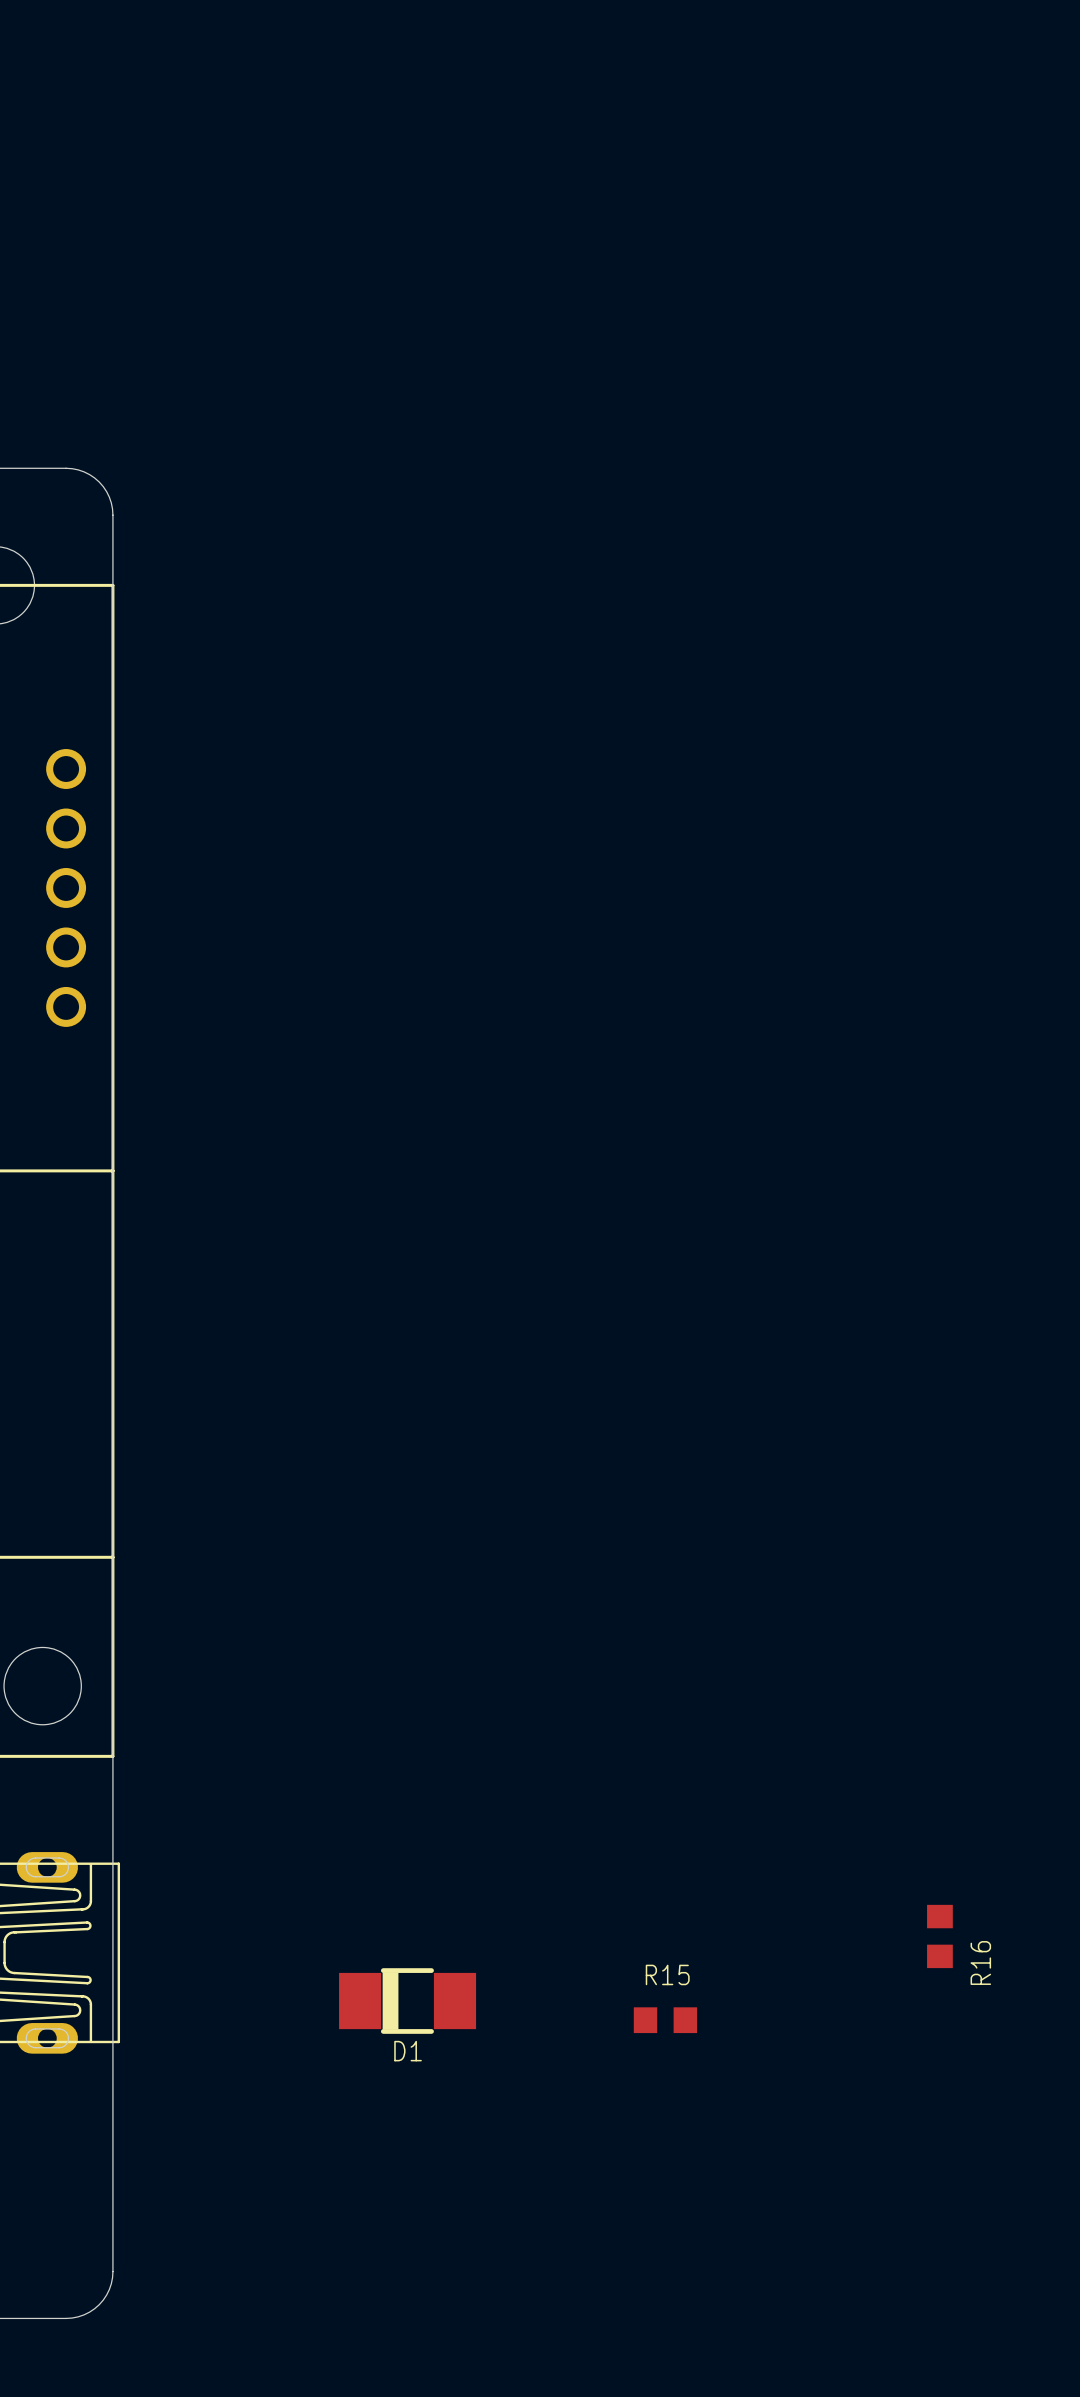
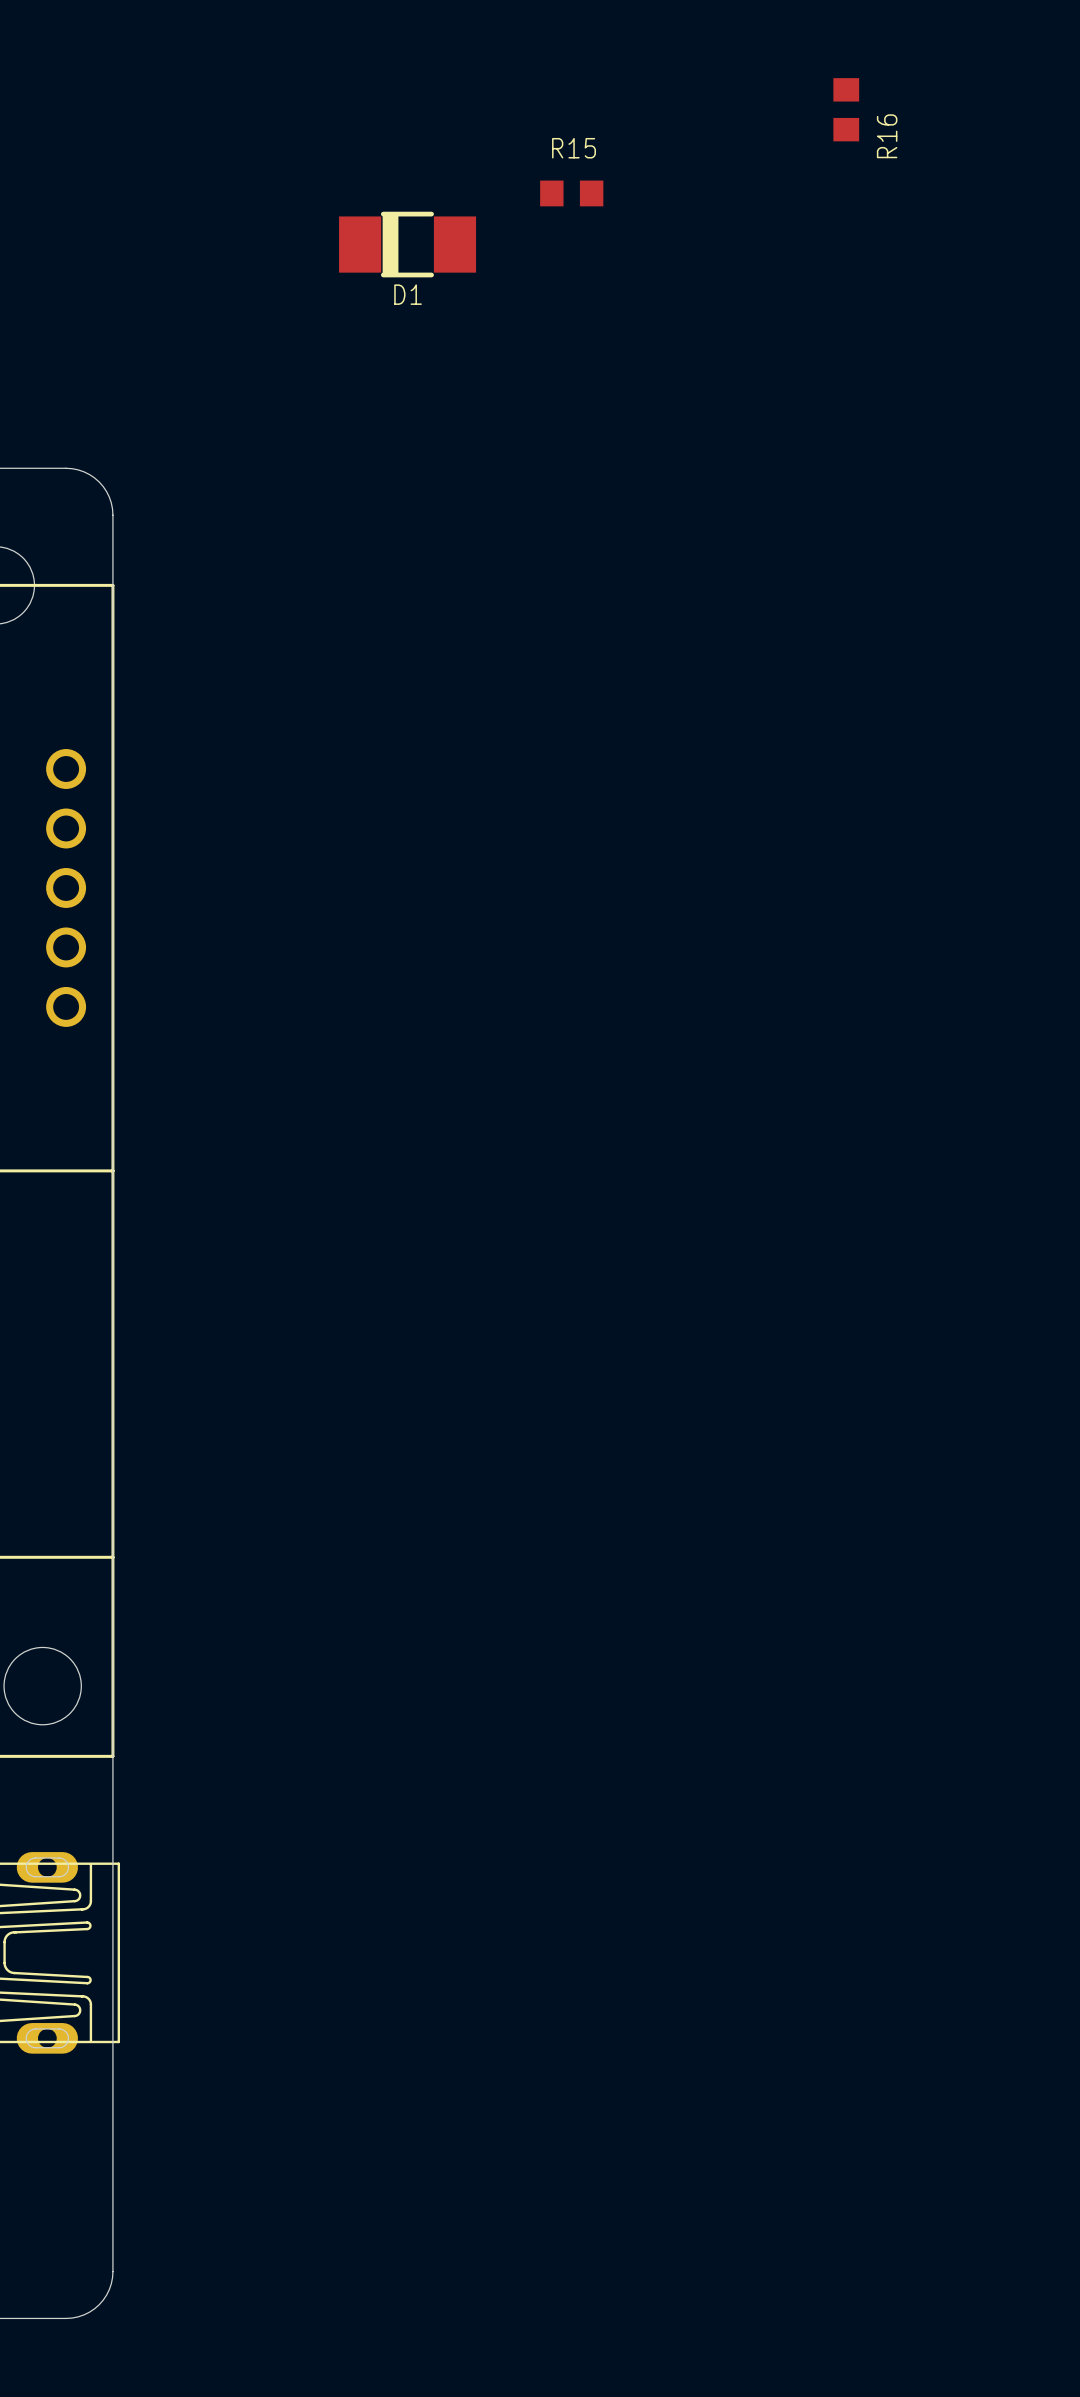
R16 position: (939, 1936) -> (846, 109)
D1 position: (407, 2001) -> (407, 244)
R15 position: (665, 2020) -> (571, 193)

